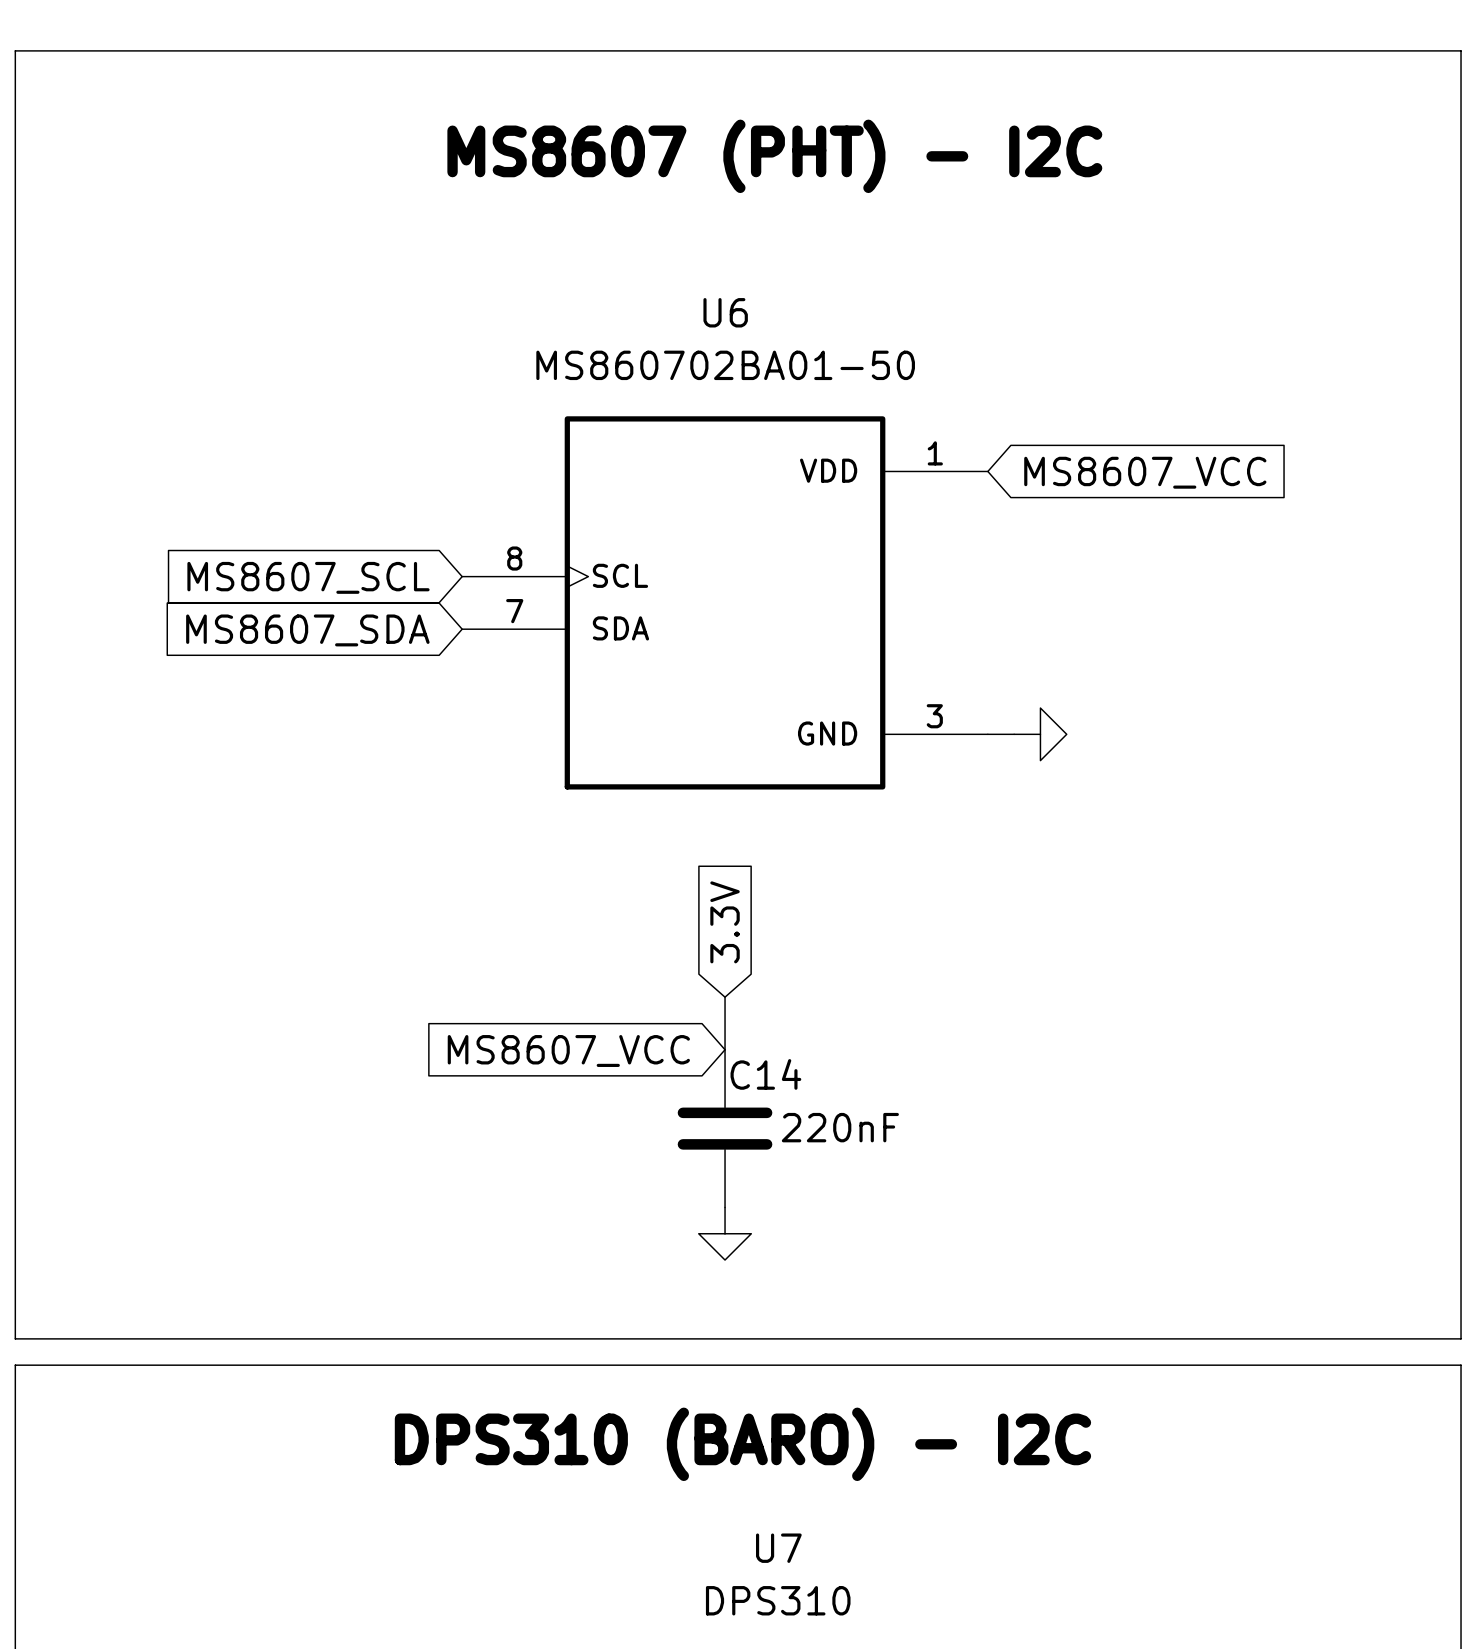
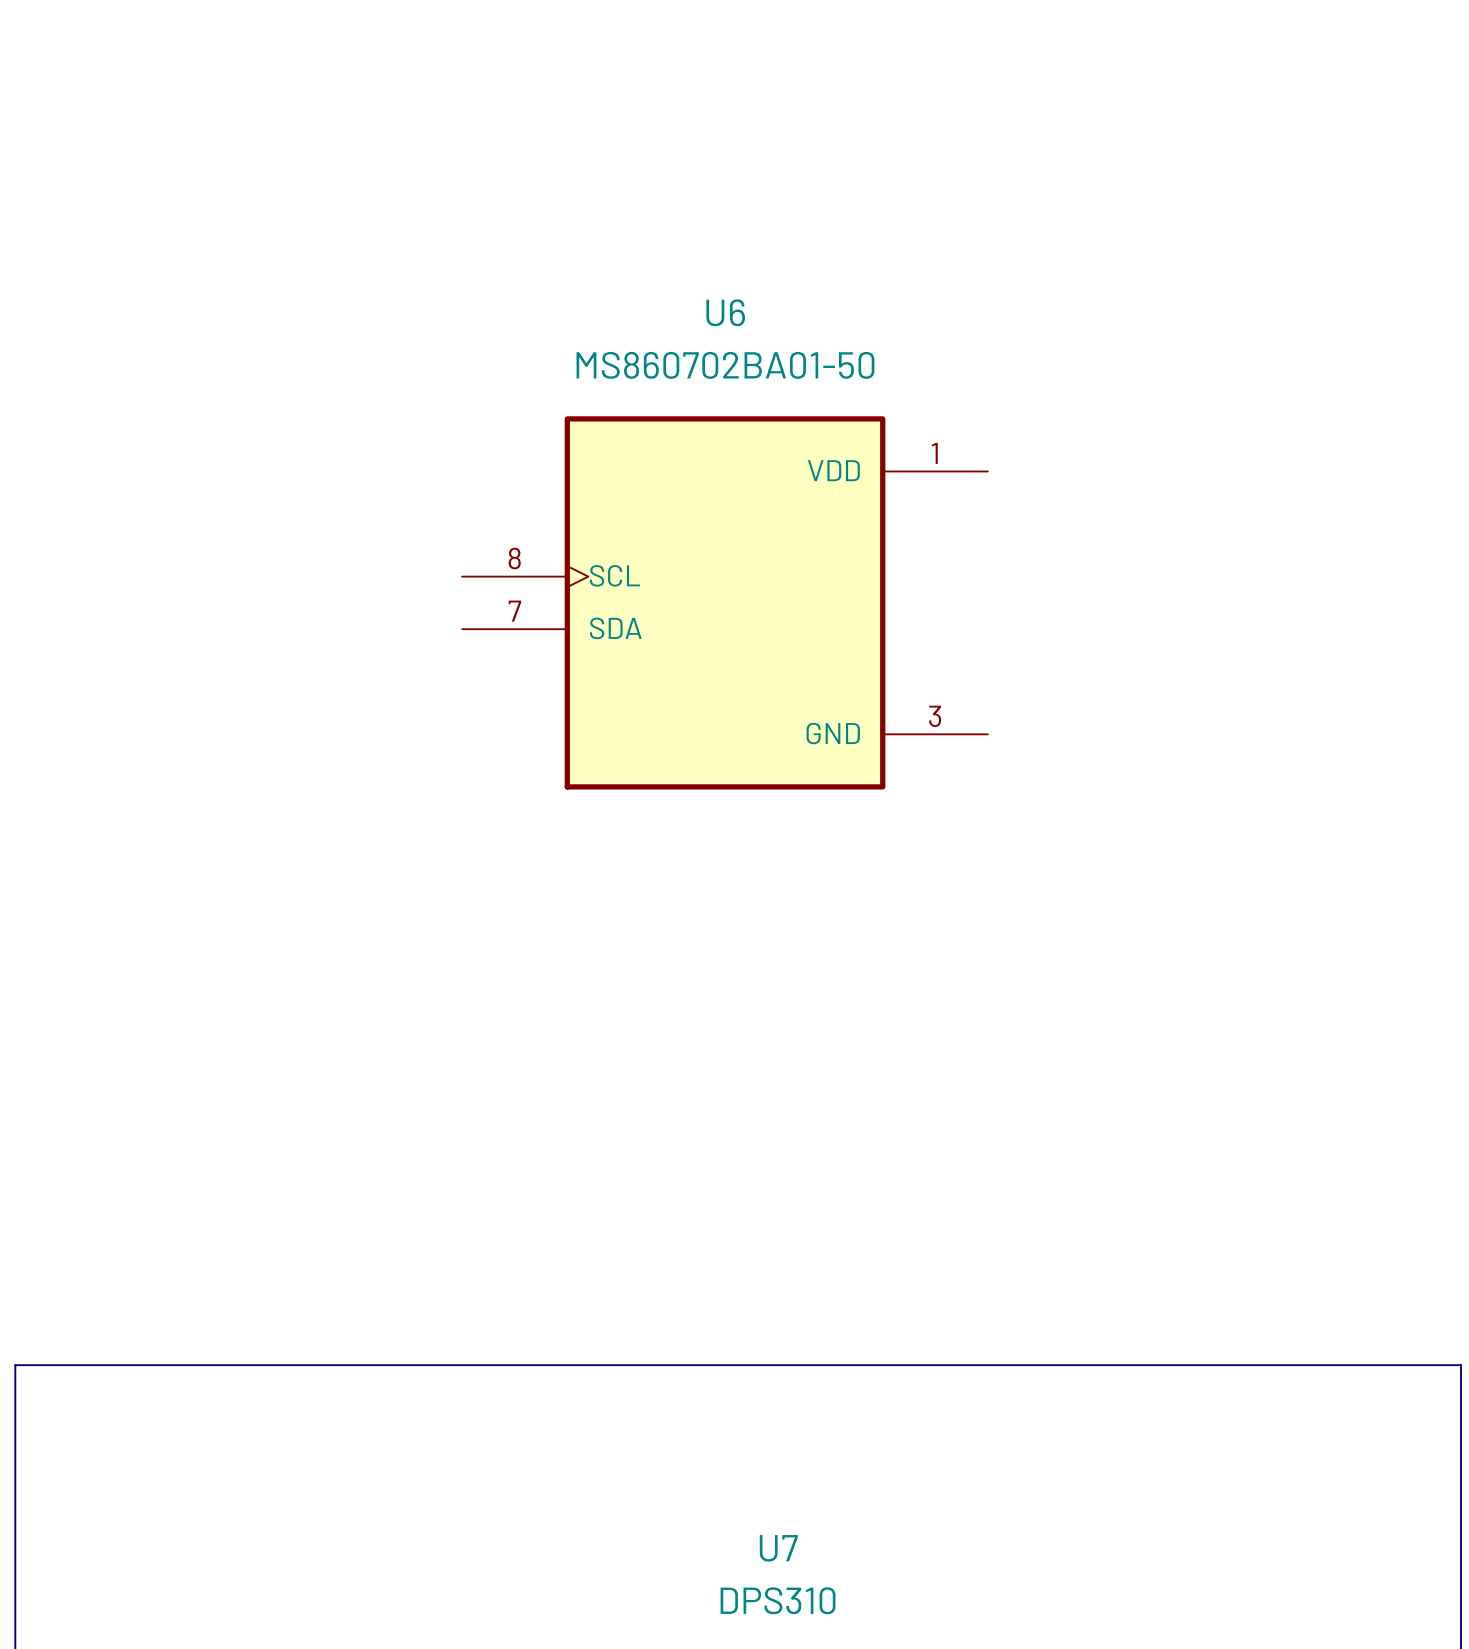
line: (15, 50) (1461, 50) (1461, 1338) (15, 1338) (15, 50) -> none
text: MS8607 (PHT) - I2C (774, 156) -> none
global label: MS8607_VCC (1145, 472) -> none
global label: MS8607_SCL (308, 577) -> none
global label: MS8607_SDA (307, 630) -> none
wire: (987, 734) (1014, 734) -> none
power symbol: (1040, 734) -> none
global label: 3.3V (725, 922) -> none
wire: (725, 997) (725, 1049) -> none
global label: MS8607_VCC (568, 1051) -> none
C14: 220nF (725, 1128) -> none
power symbol: (725, 1233) -> none
text: DPS310 (BARO) - I2C (742, 1444) -> none

